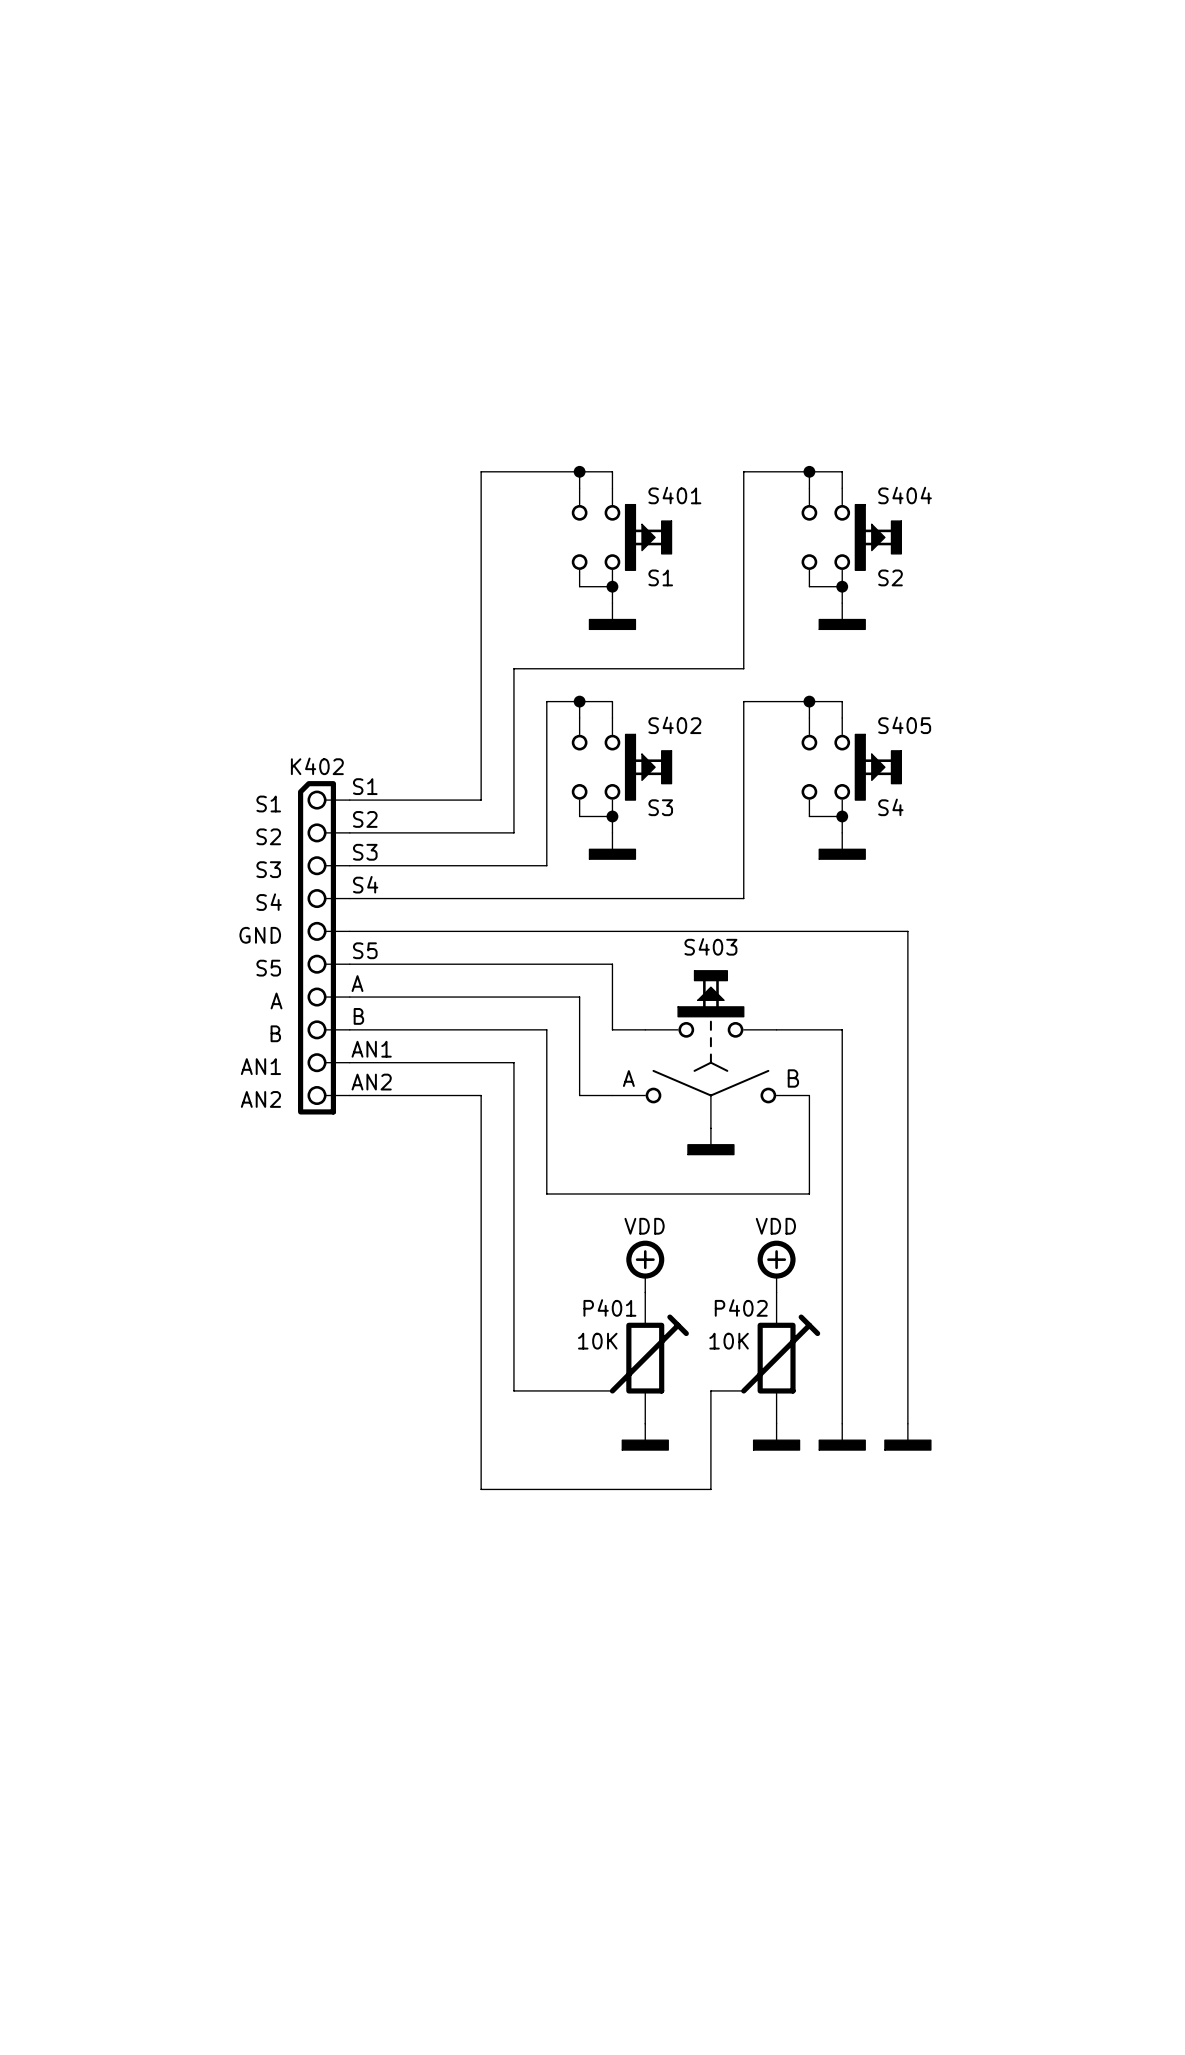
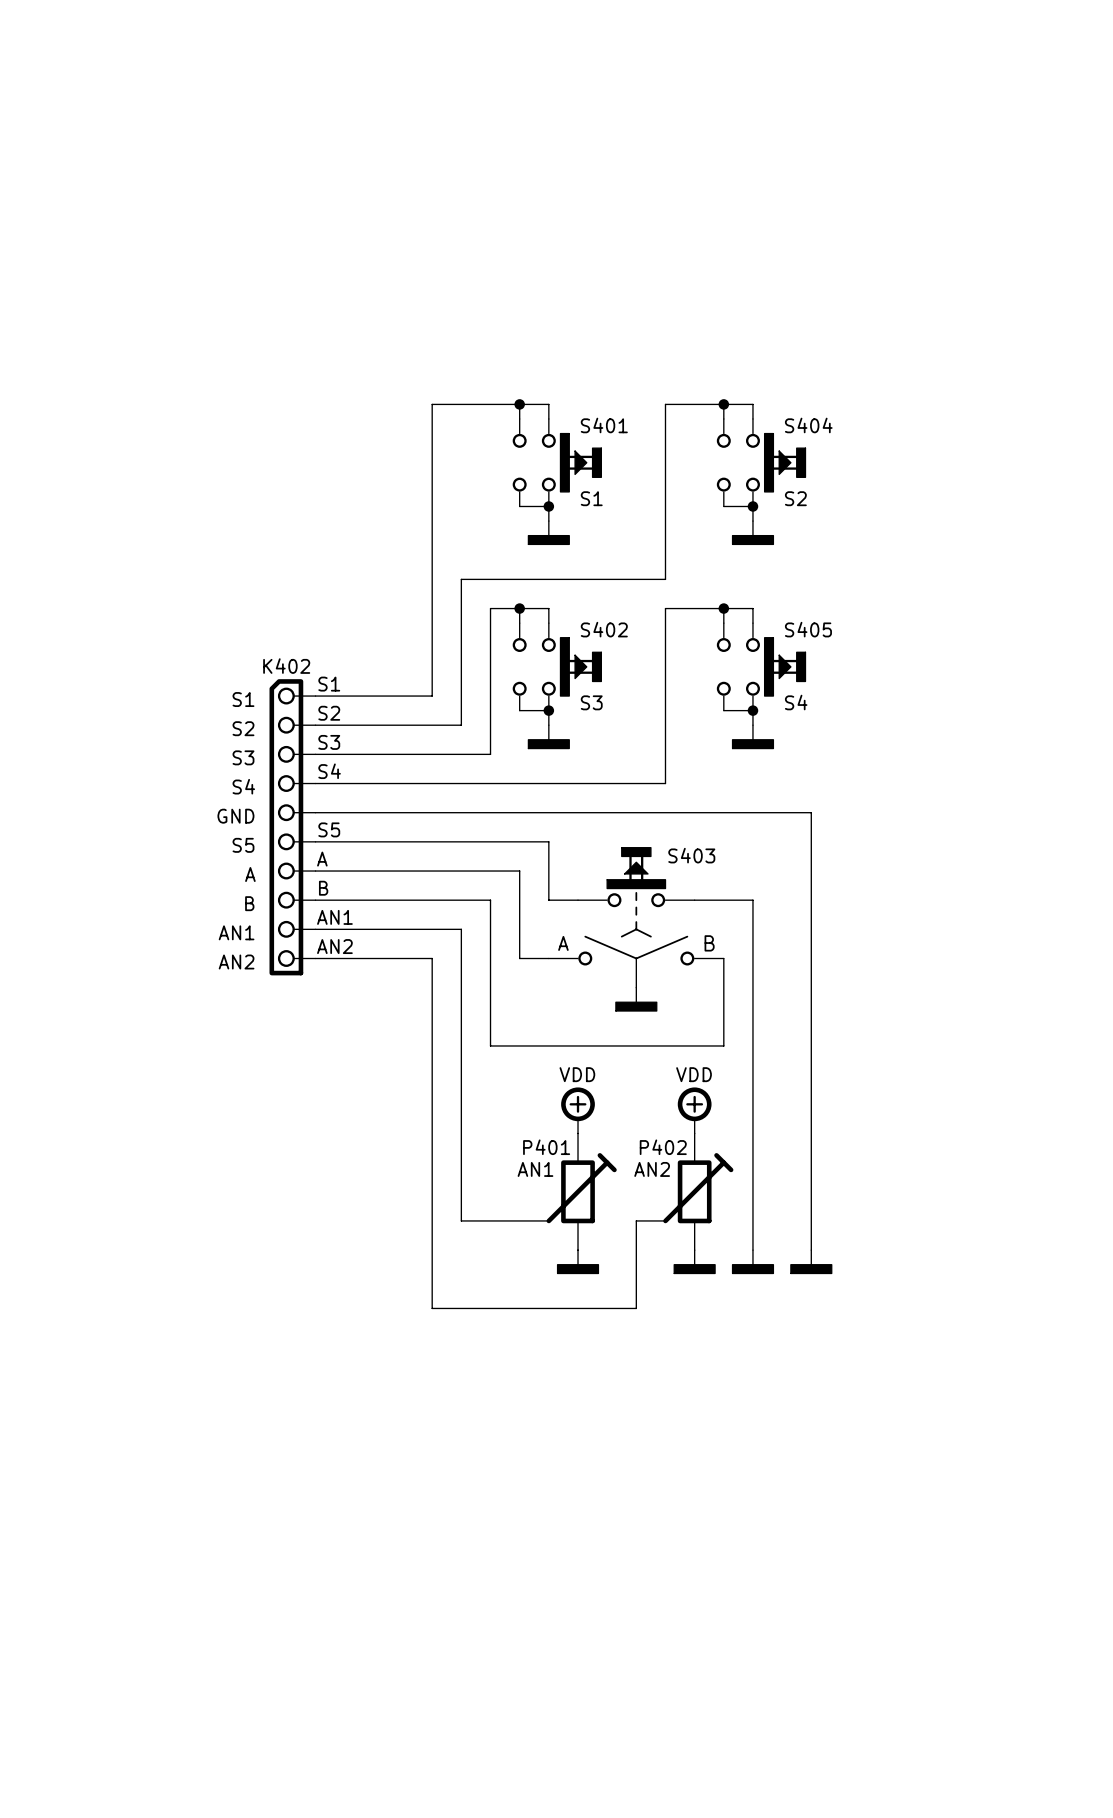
S403 name position: S403 (710, 946) -> S403 (691, 855)
P401 value: none -> AN1 (535, 1169)
P402 value: none -> AN2 (652, 1169)
P401 text: 10K (597, 1341) -> none
P402 text: 10K (729, 1341) -> none

